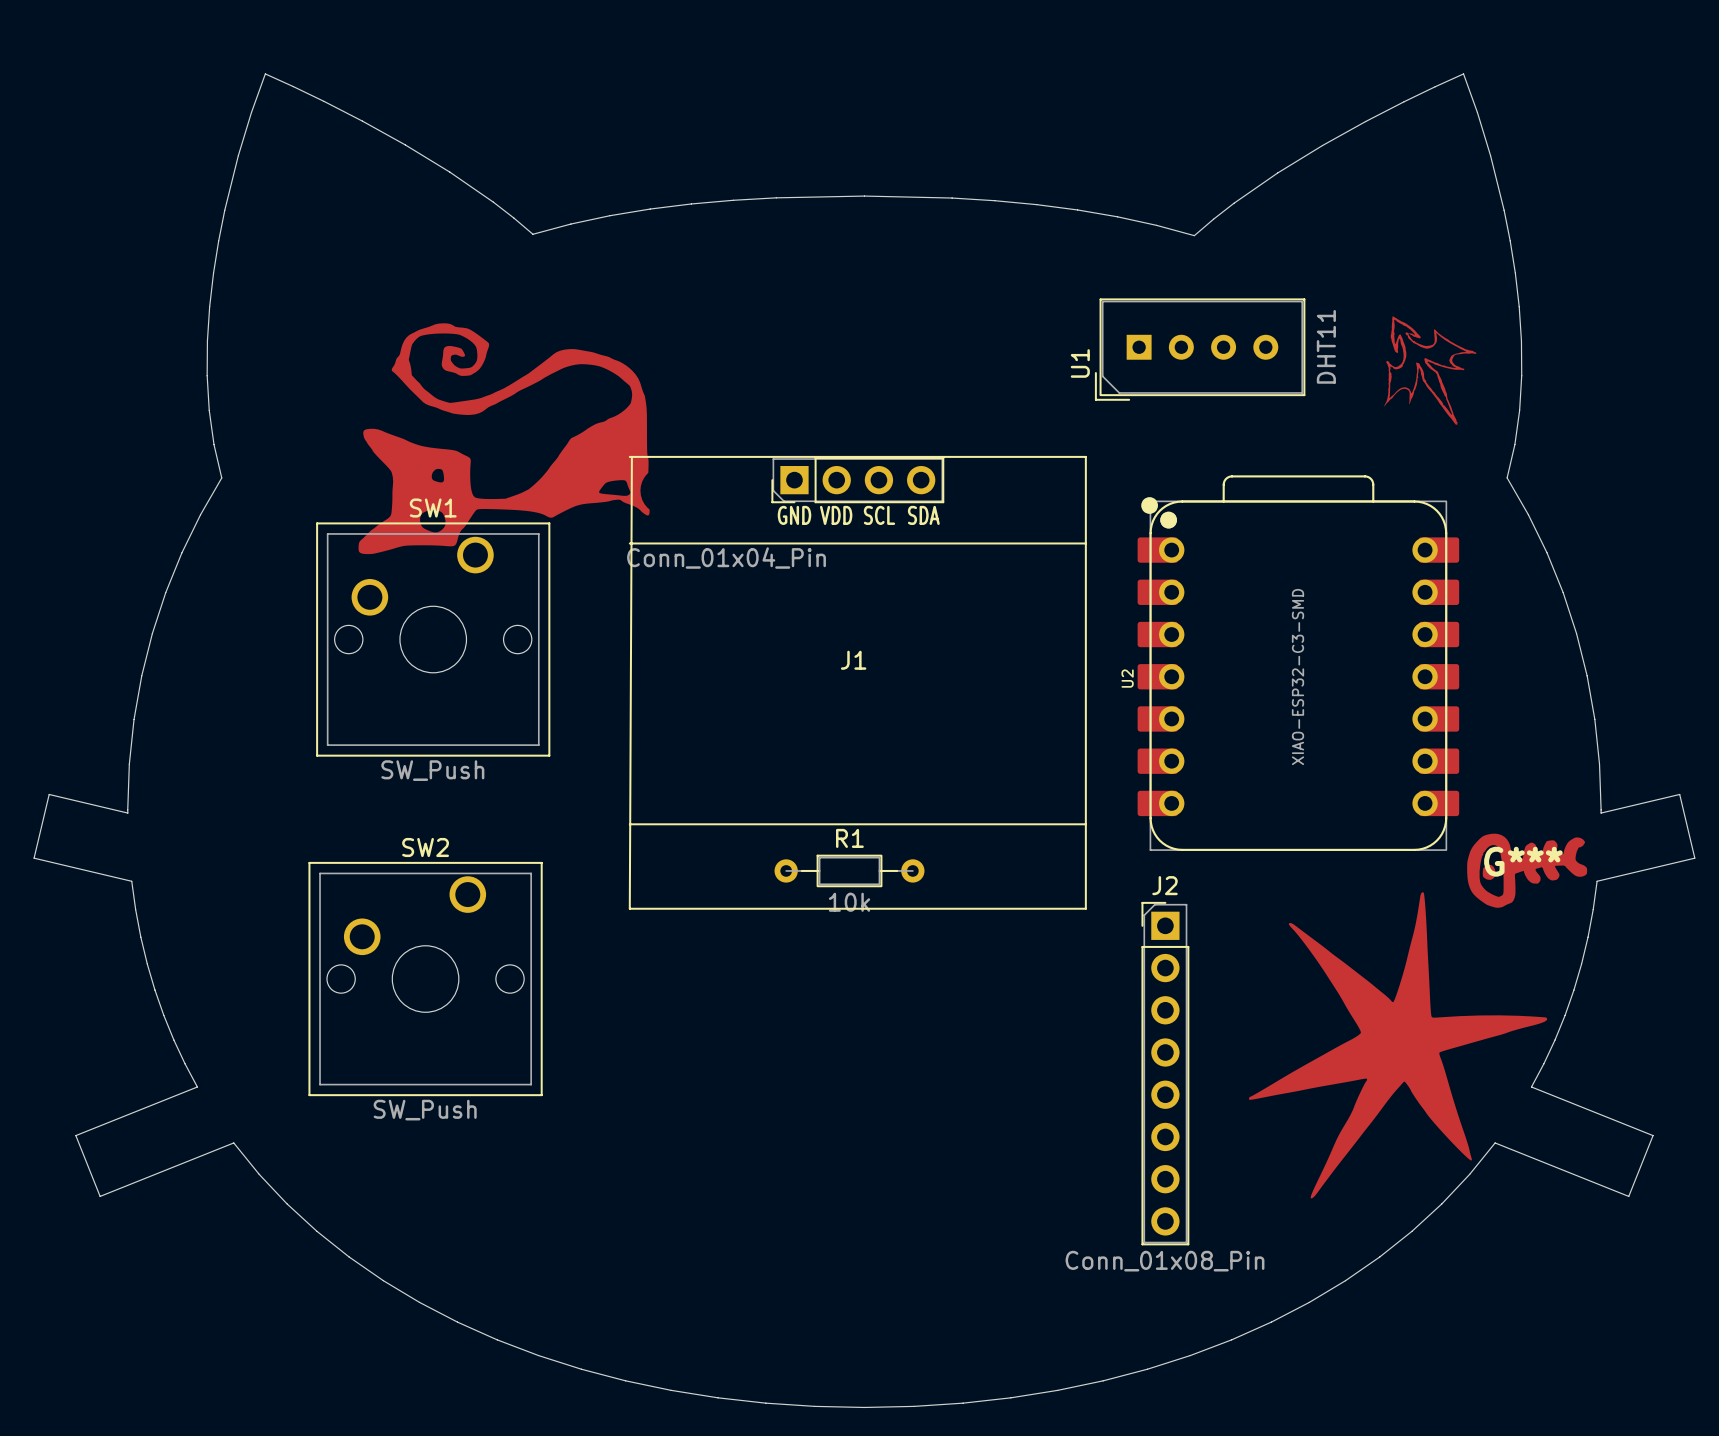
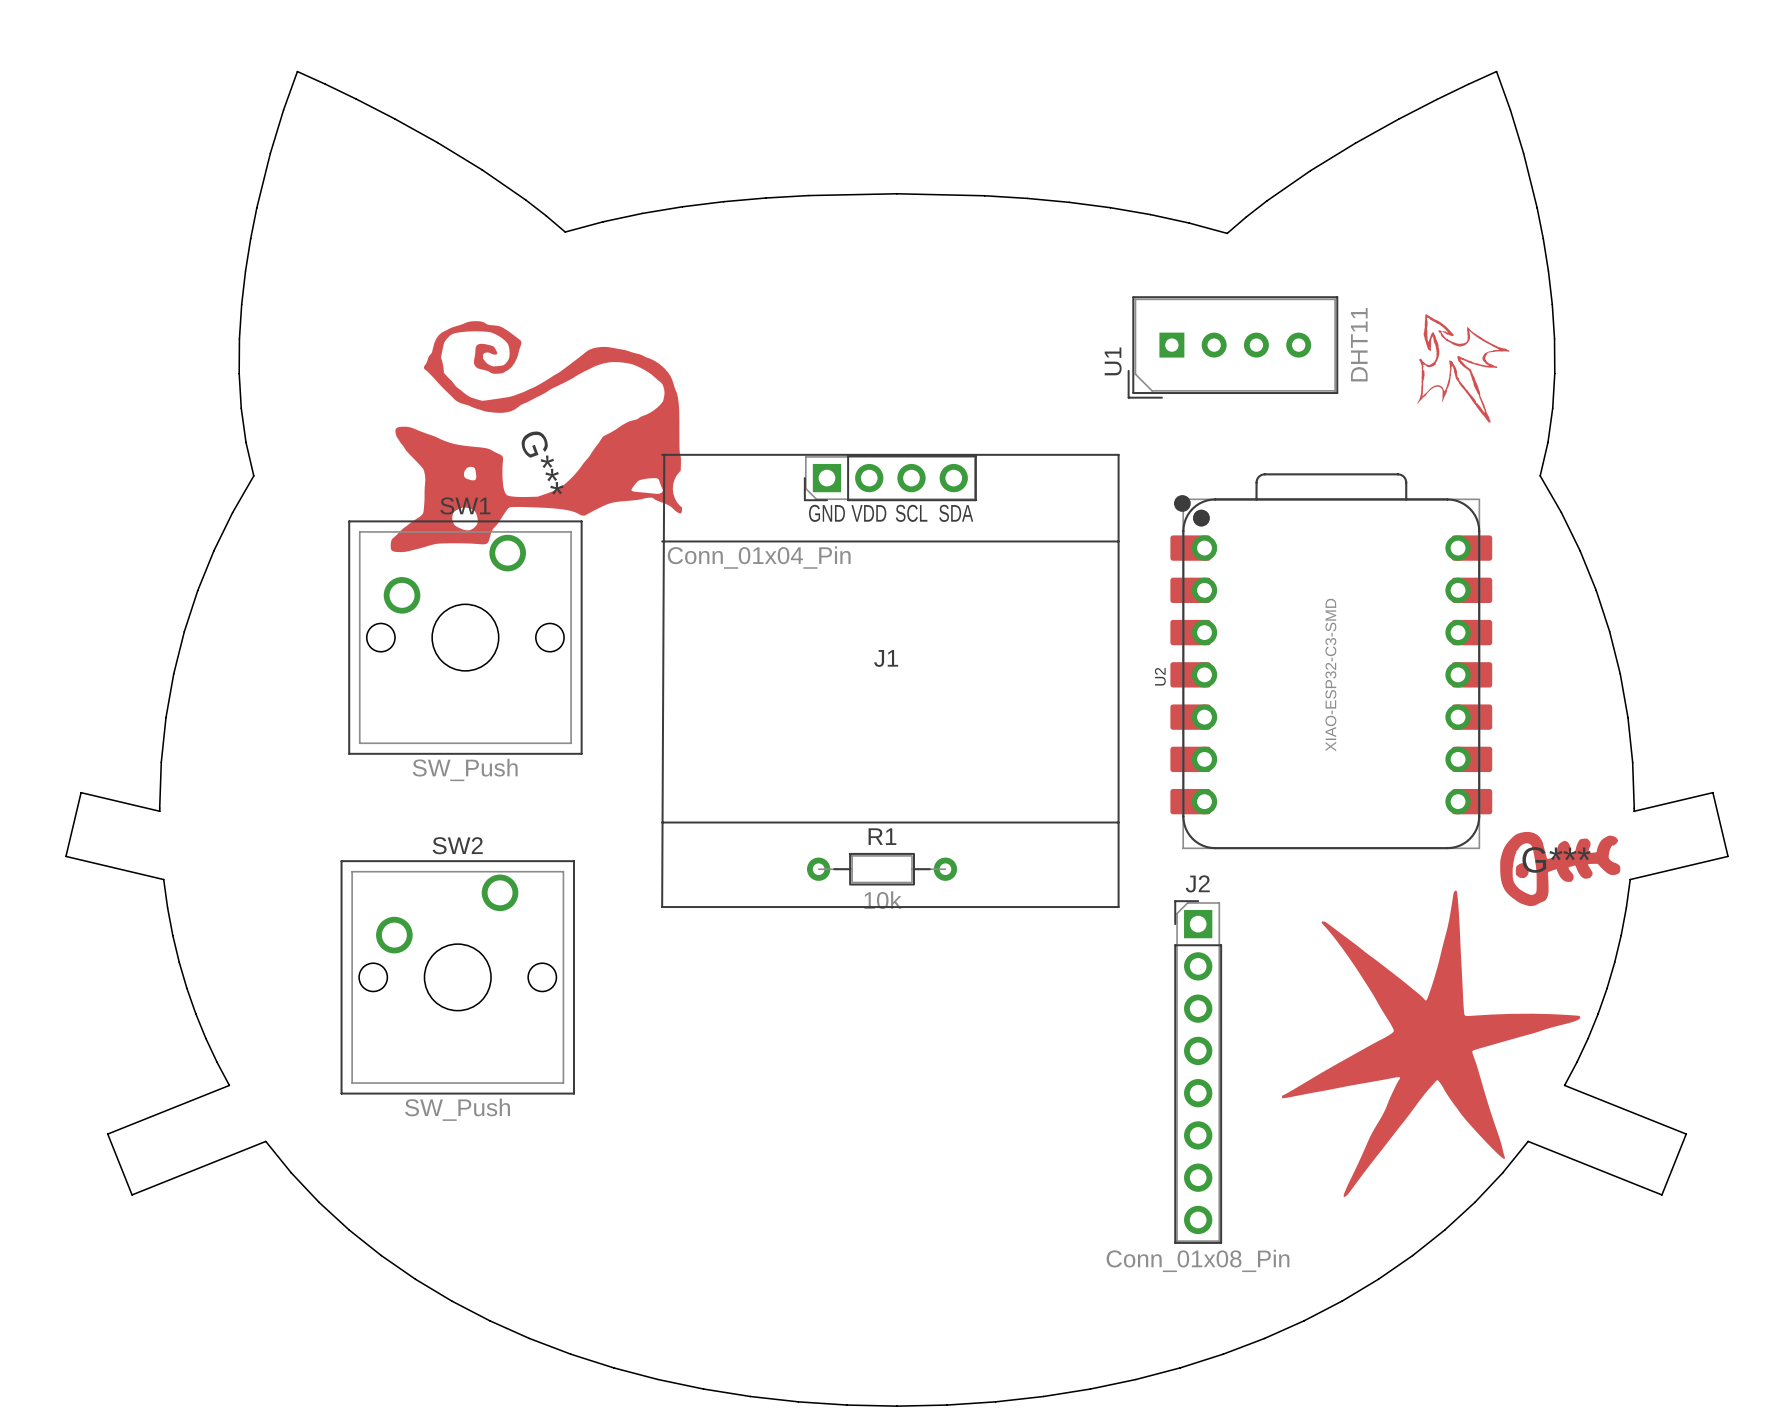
drawing: [358, 323, 650, 555] -> none
G***: none -> (536, 436)

